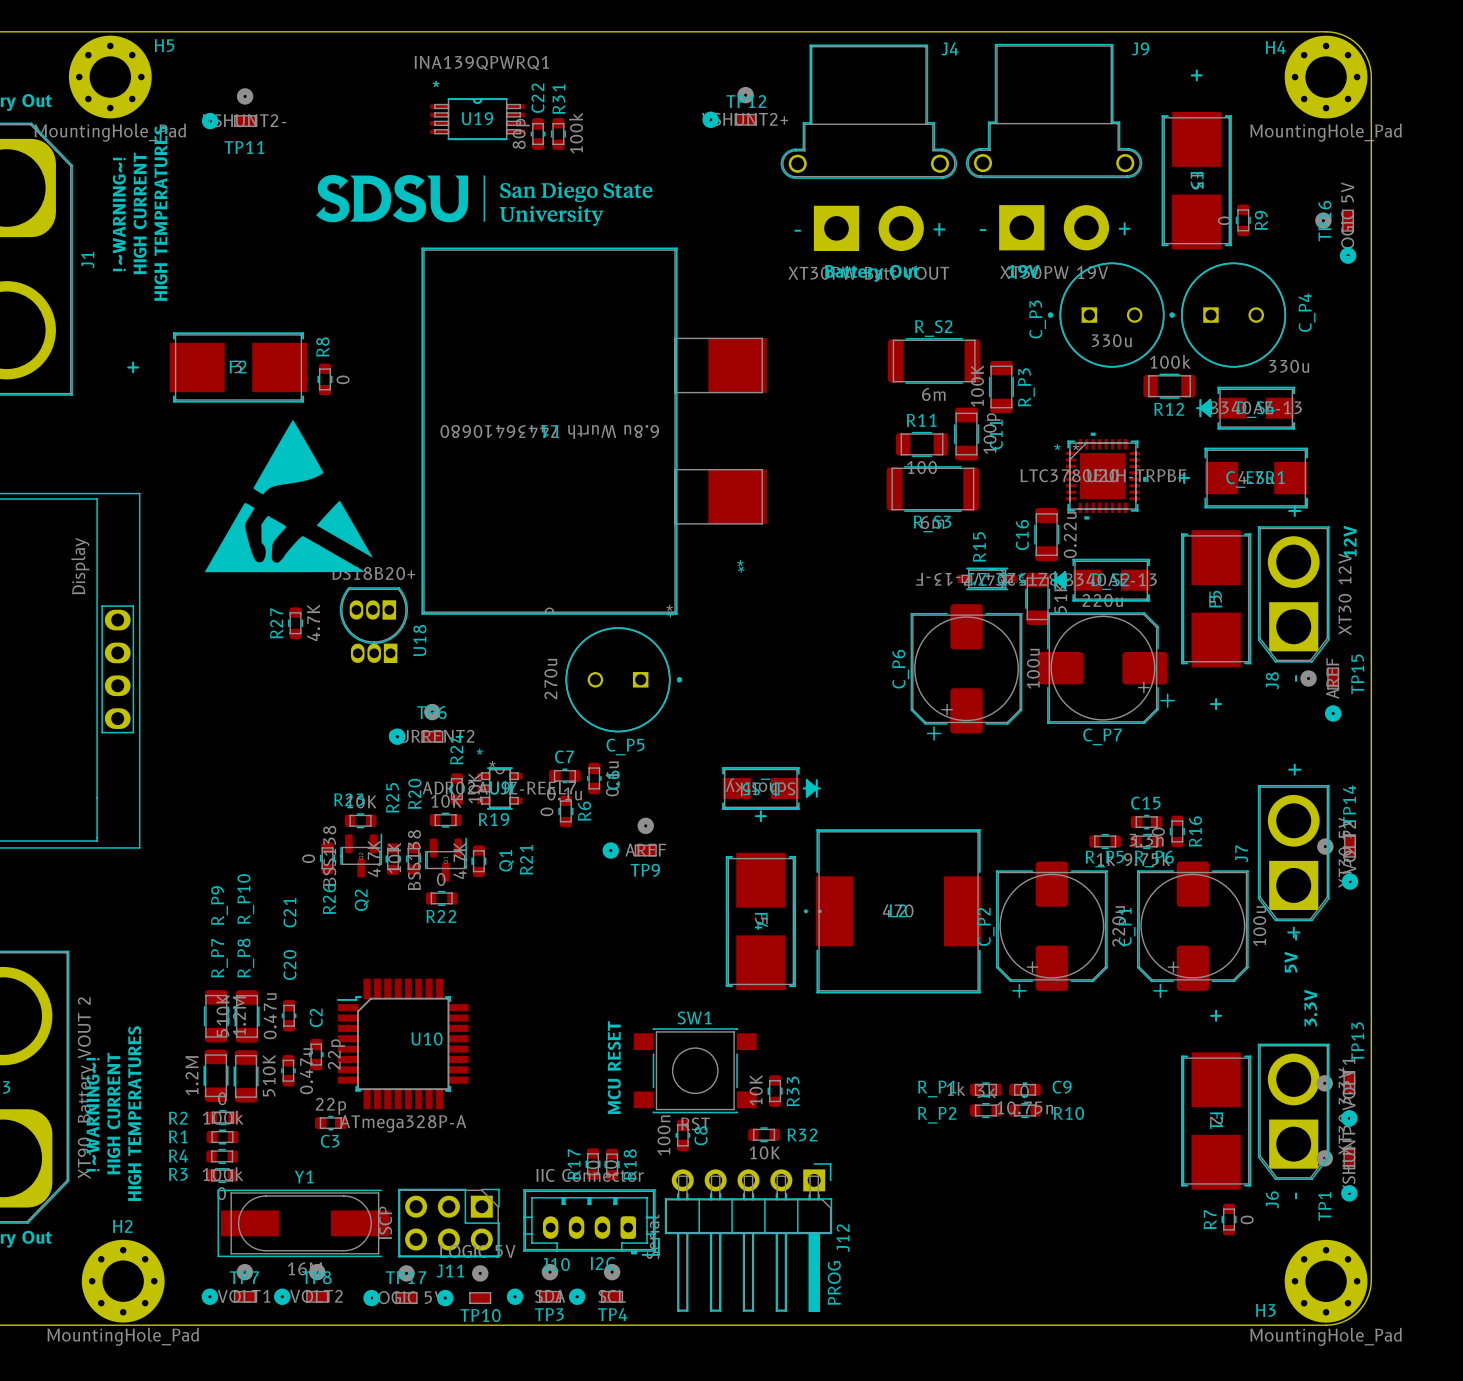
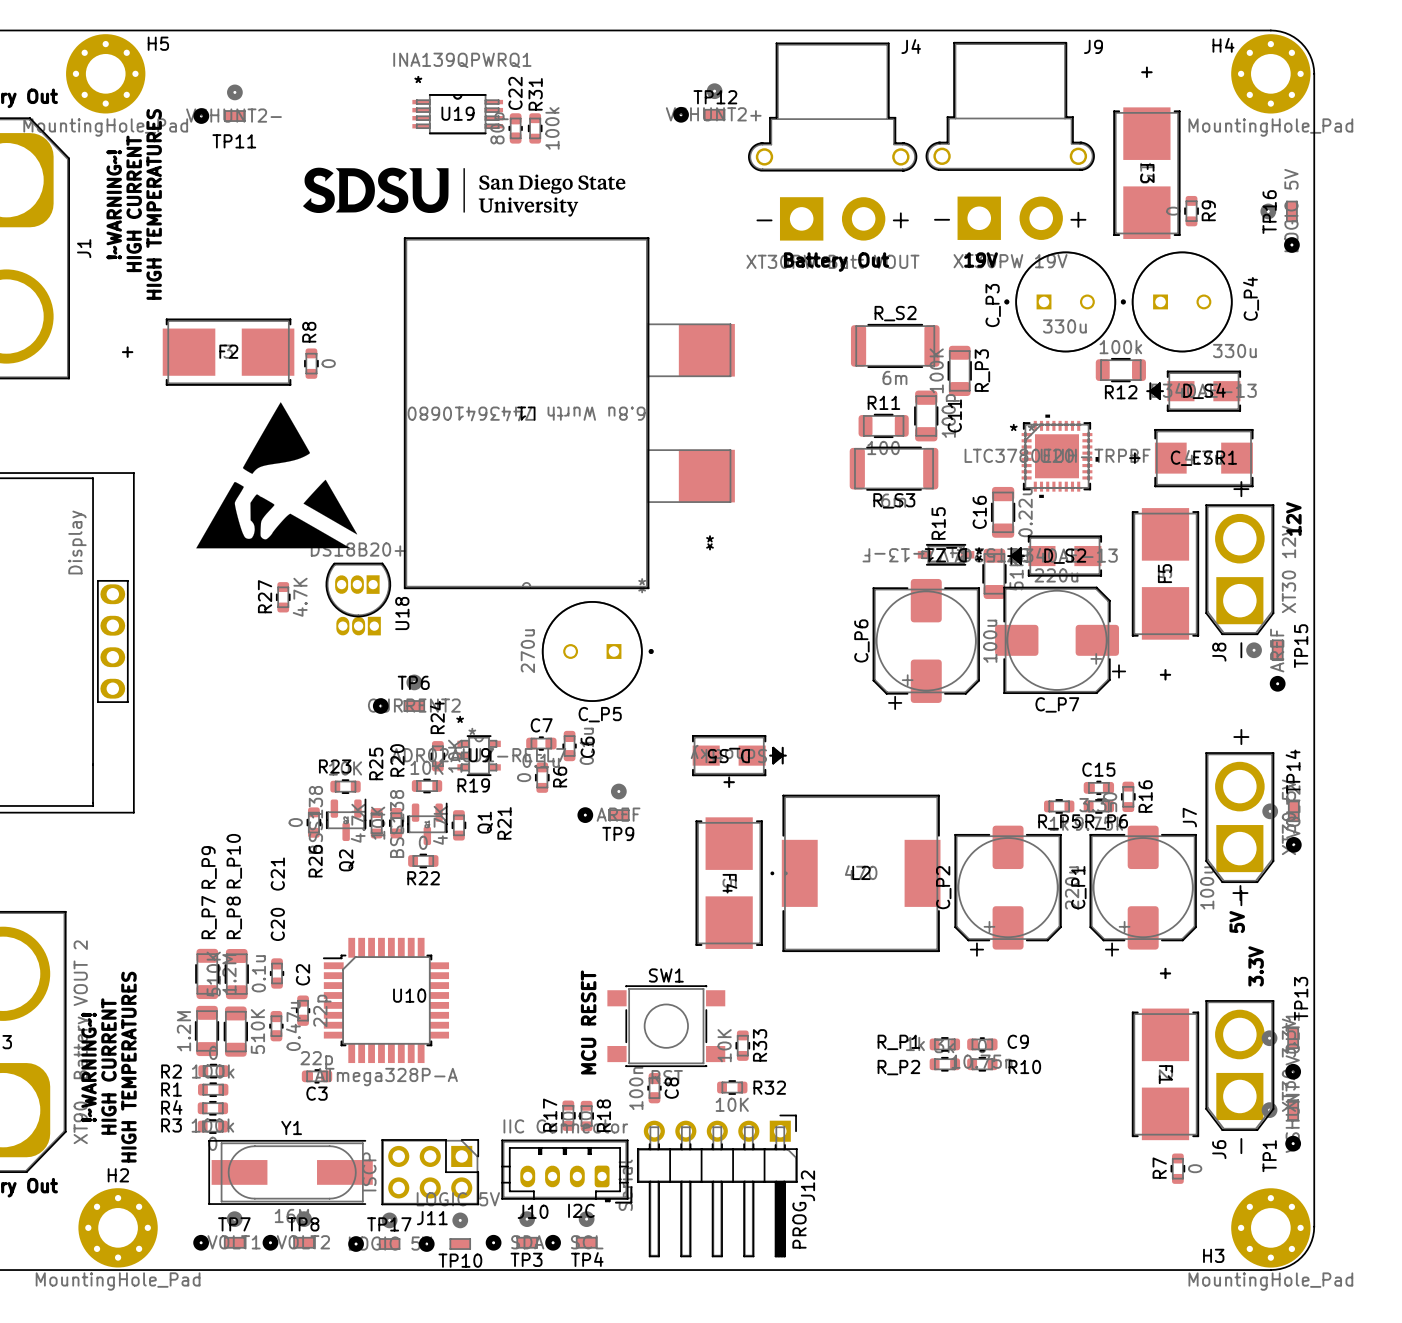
C21 value: 0.47u (270, 1016) -> 0.1u (258, 973)

